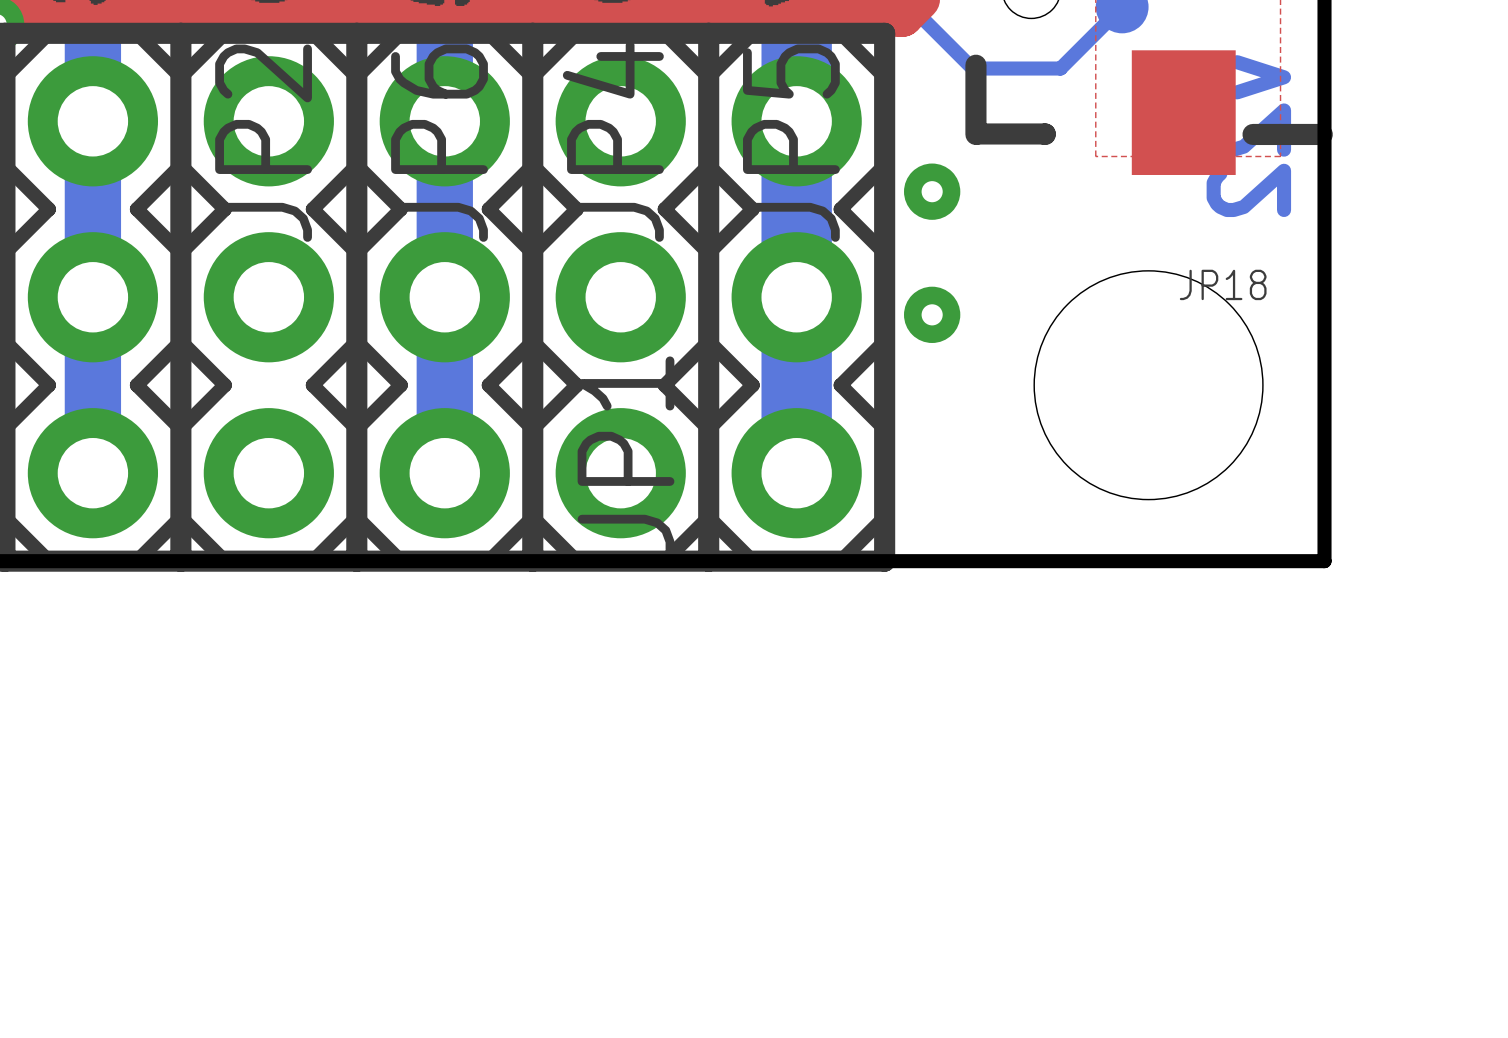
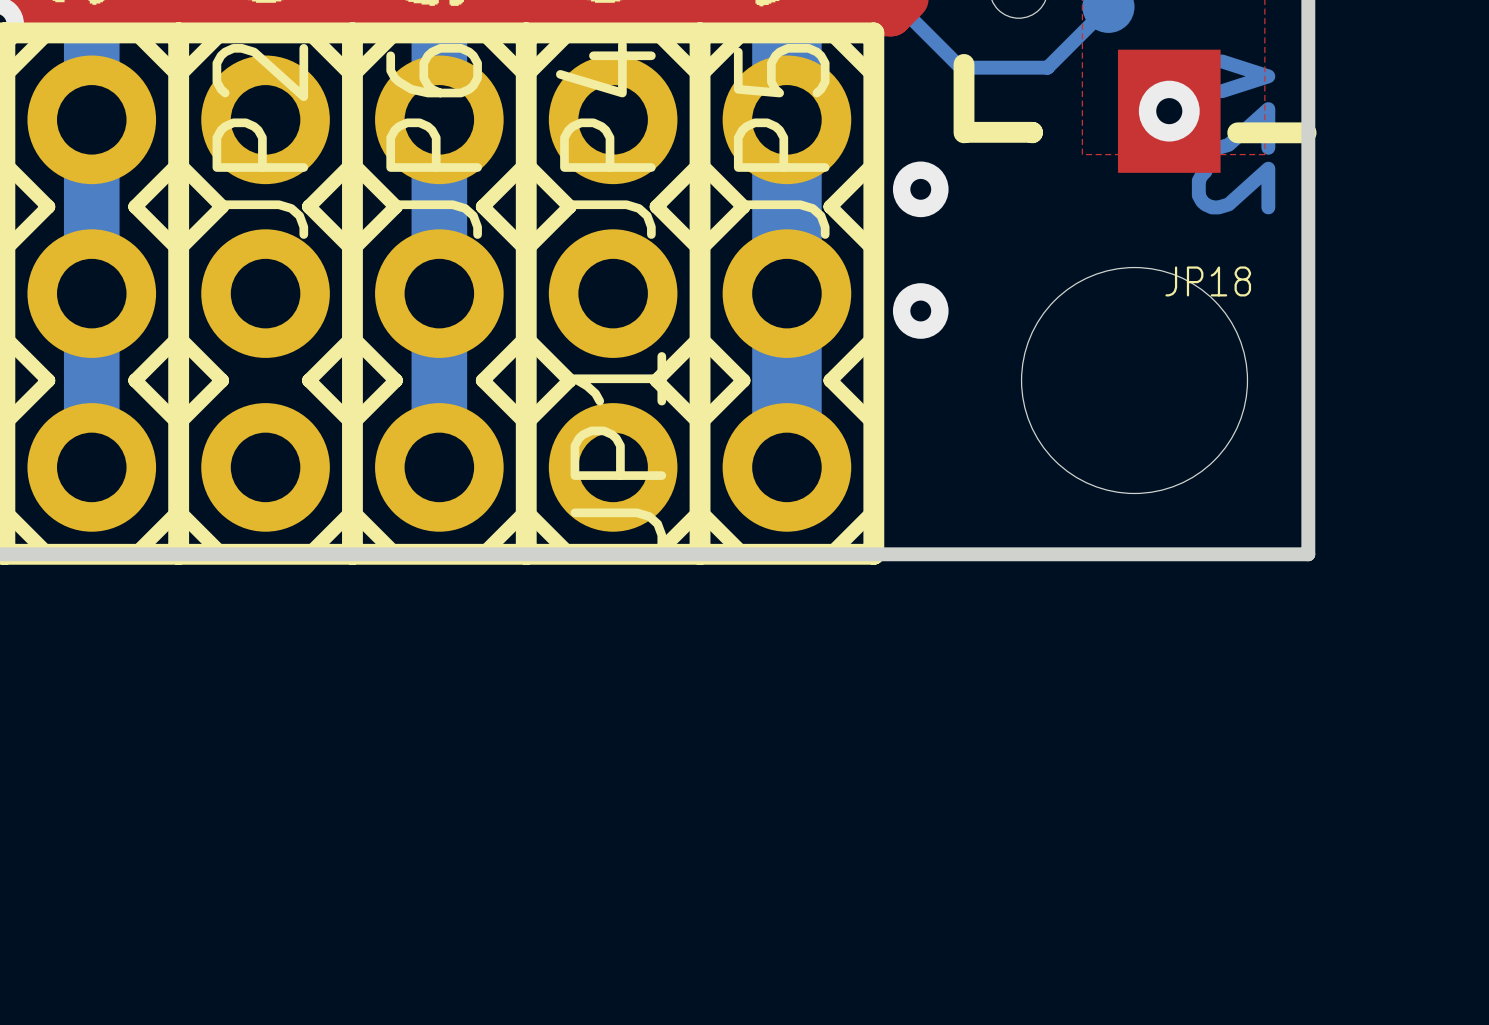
via: none -> (1169, 111)

